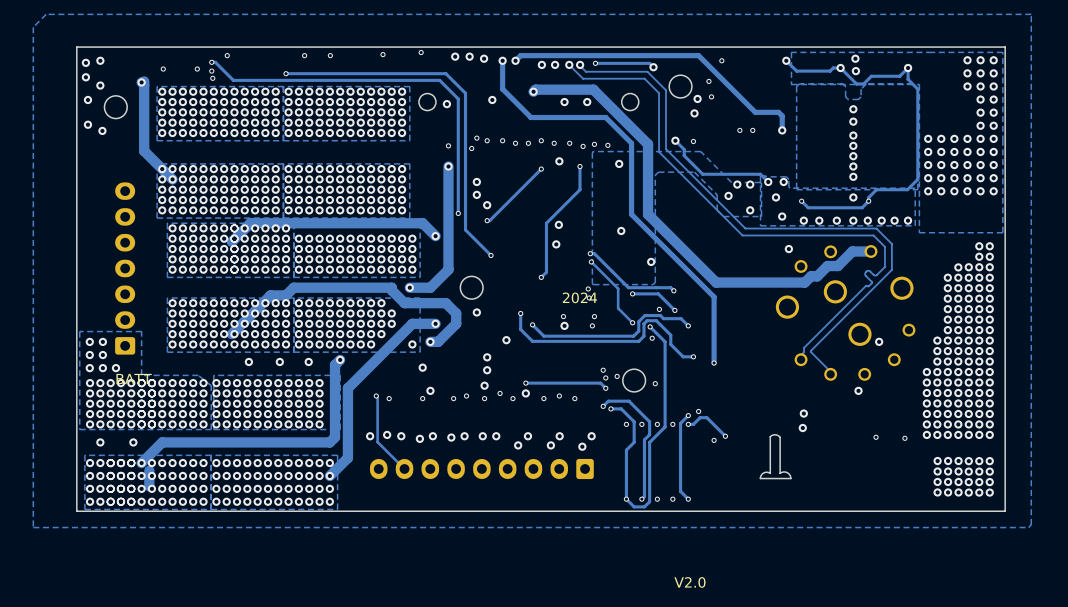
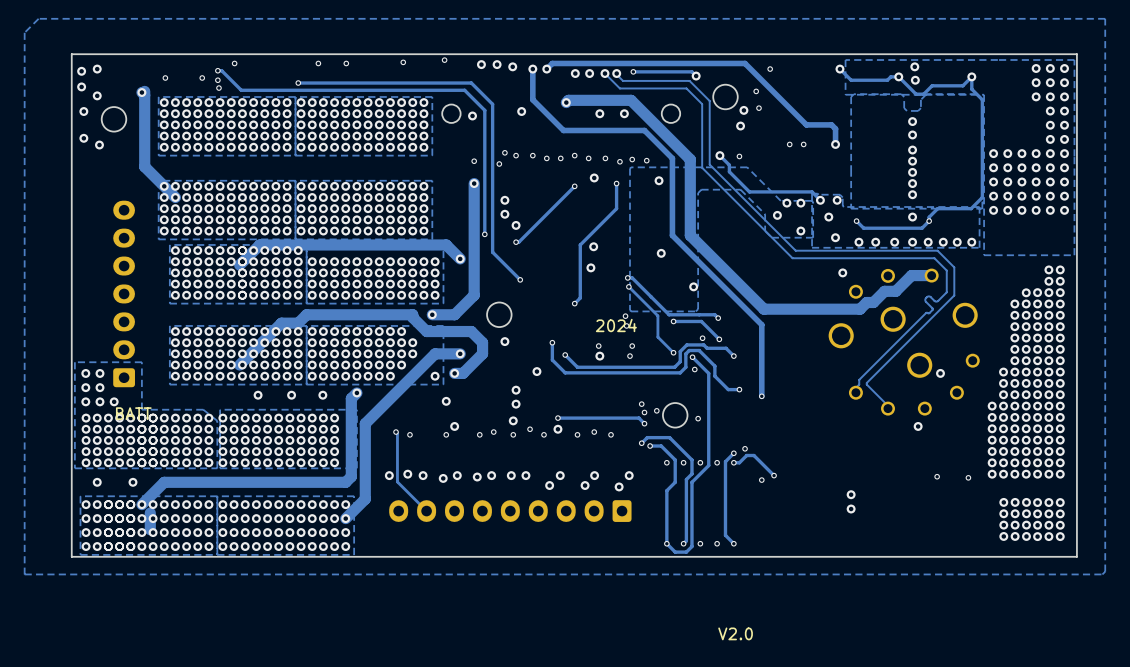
via: (803, 413) -> none
via: (802, 428) -> none
board edge: (770, 436) (770, 473) (763, 472) (760, 478) (790, 478) (787, 472) (780, 473) (780, 437) (775, 434) (770, 436) -> none
via: none -> (851, 494)
via: none -> (851, 509)

